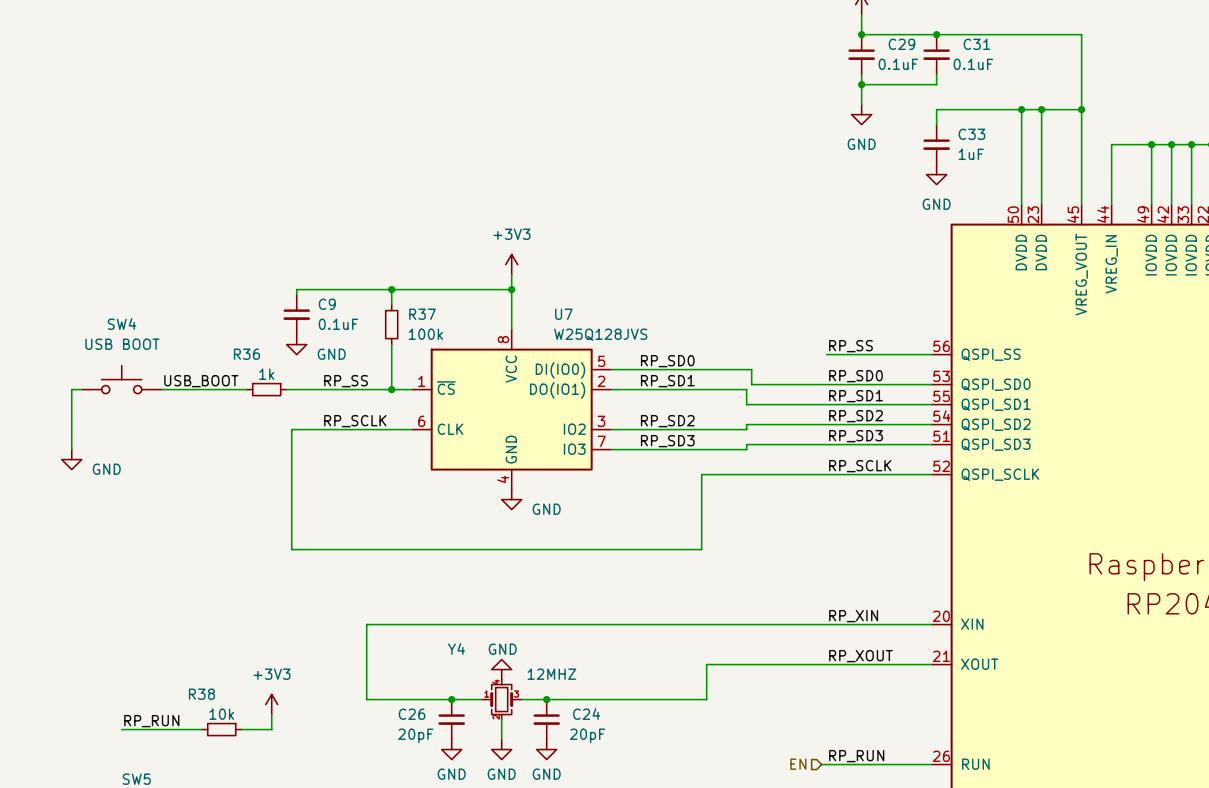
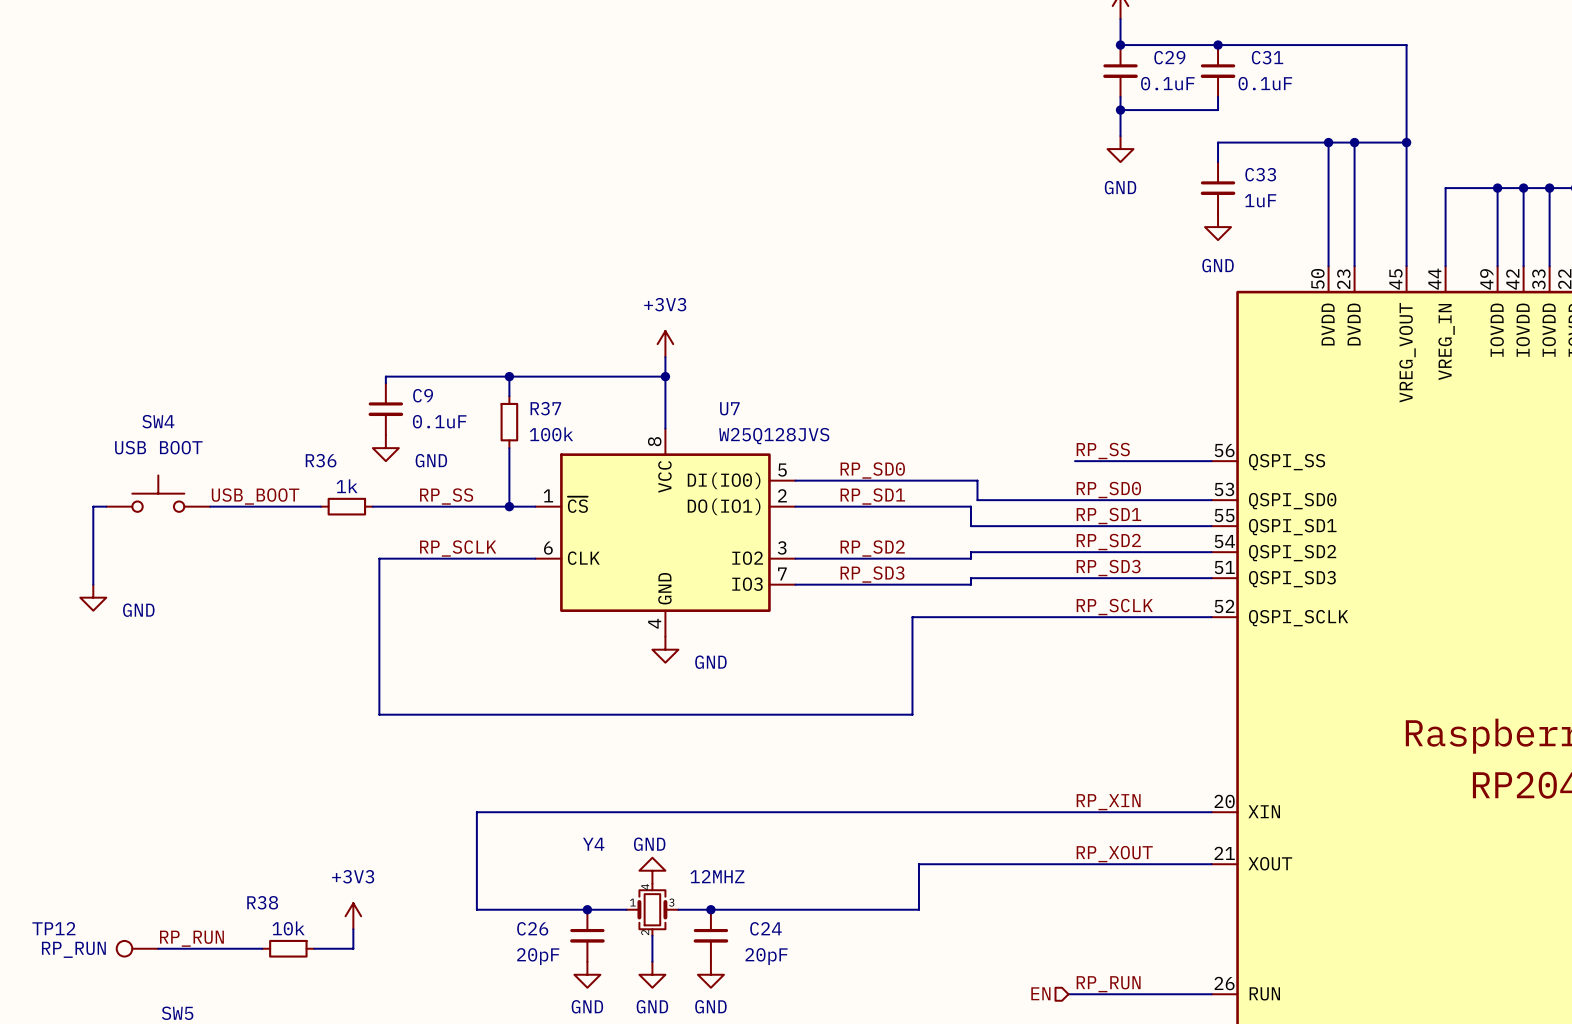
TP12: none -> RP_RUN (137, 948)

